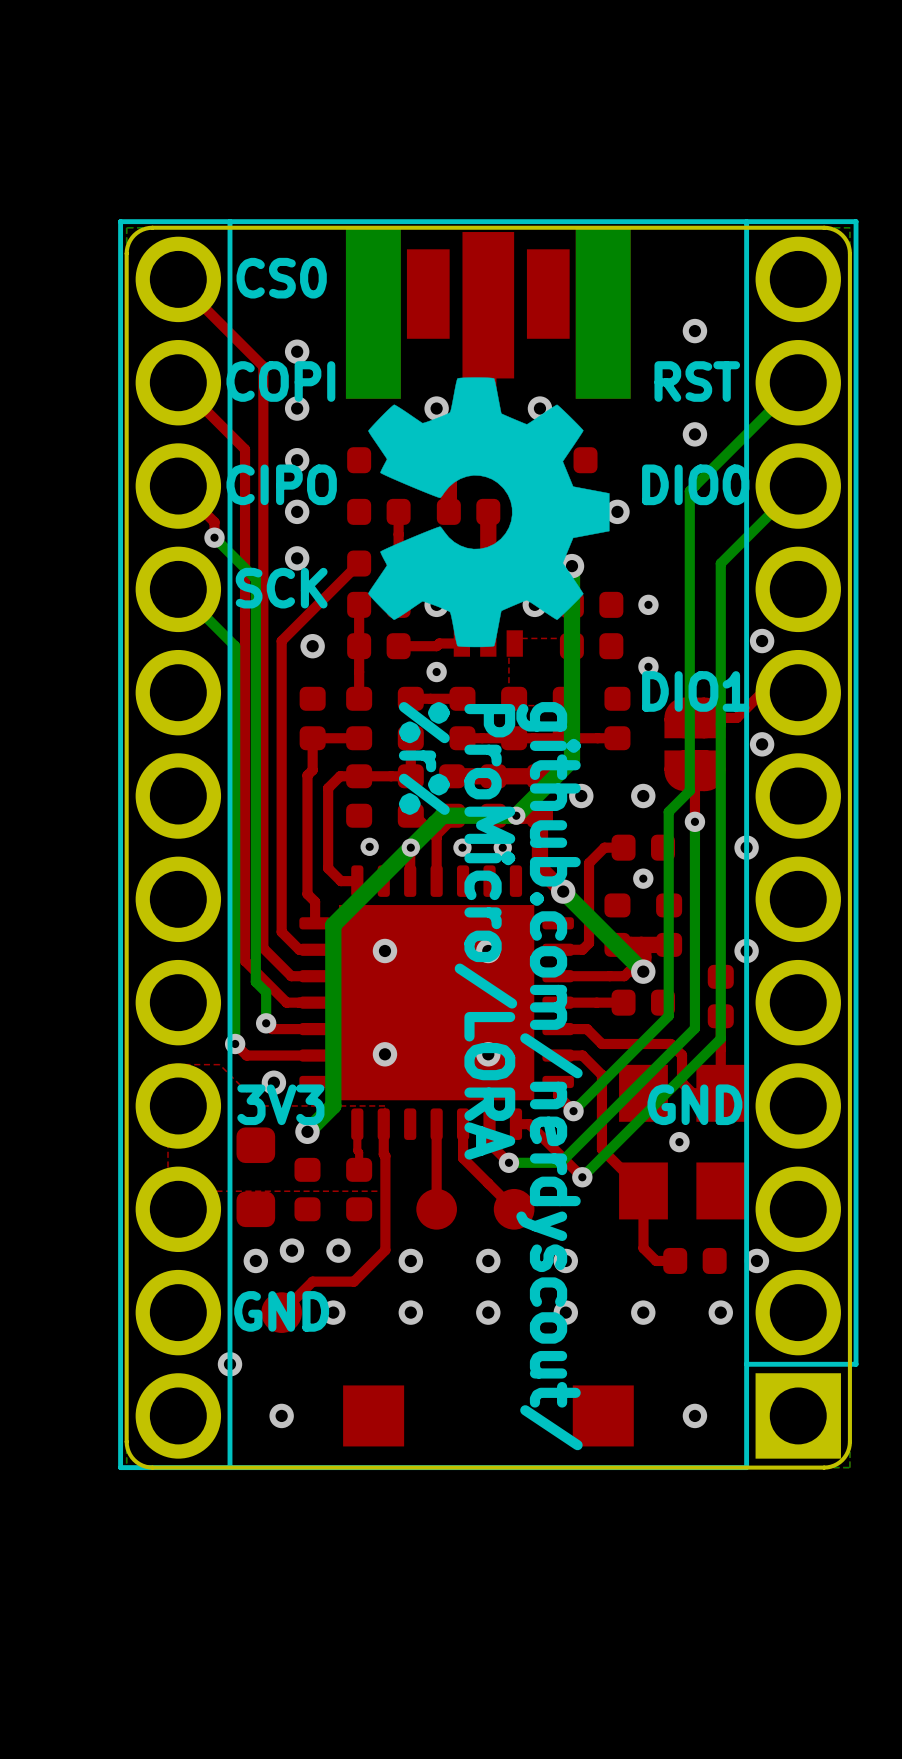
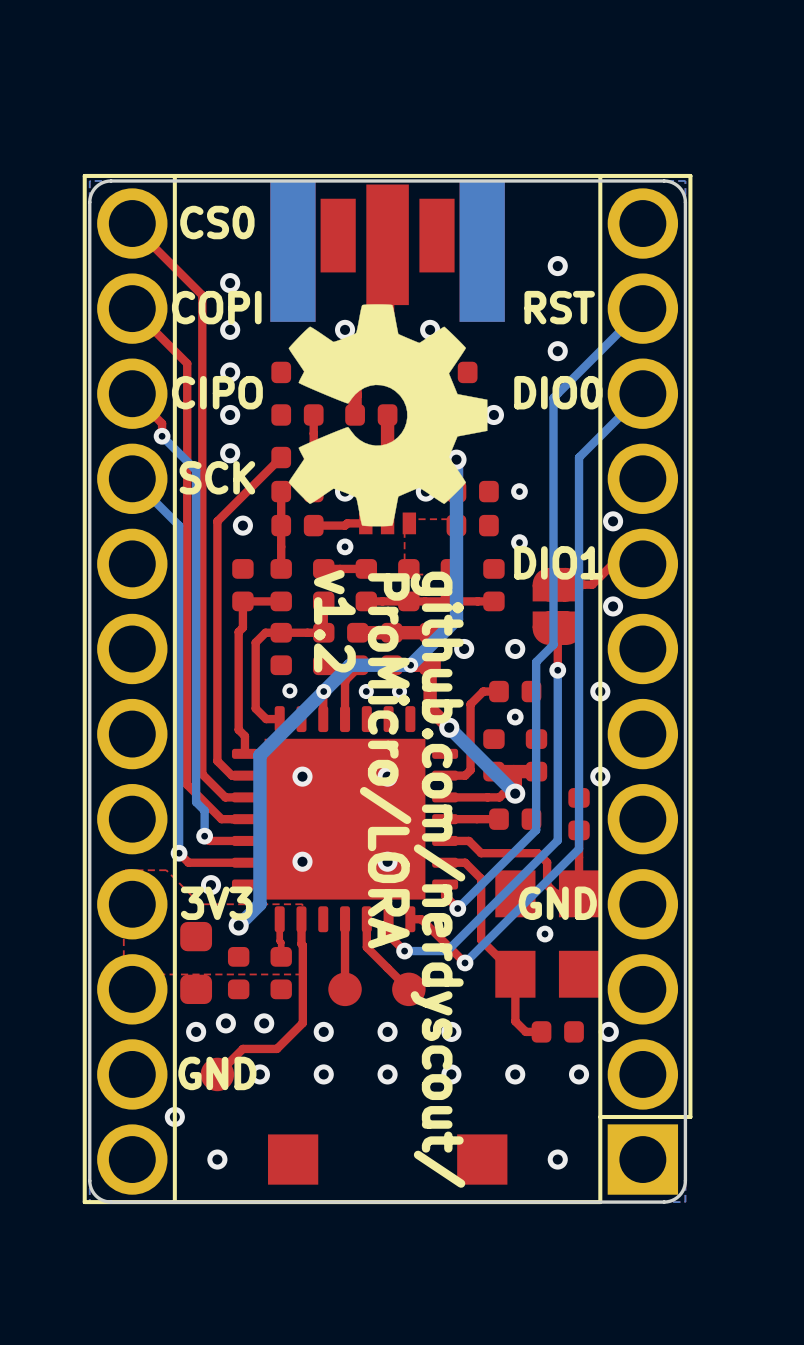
text: %r% (424, 758) -> v1.2 (334, 621)

